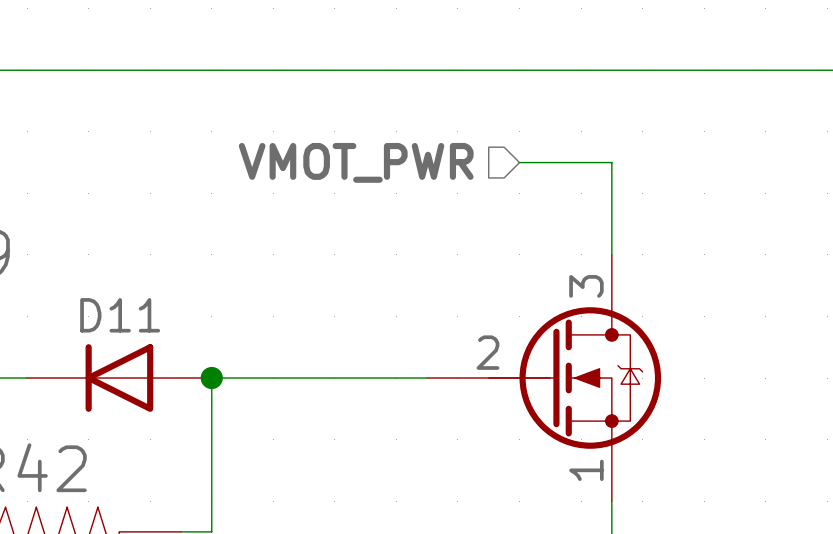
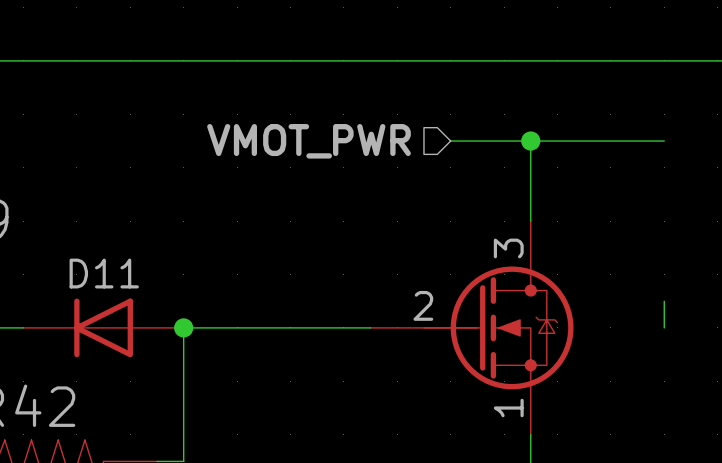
wire: none -> (530, 141) (664, 141)
junction: none -> (530, 141)
wire: none -> (664, 301) (664, 327)

